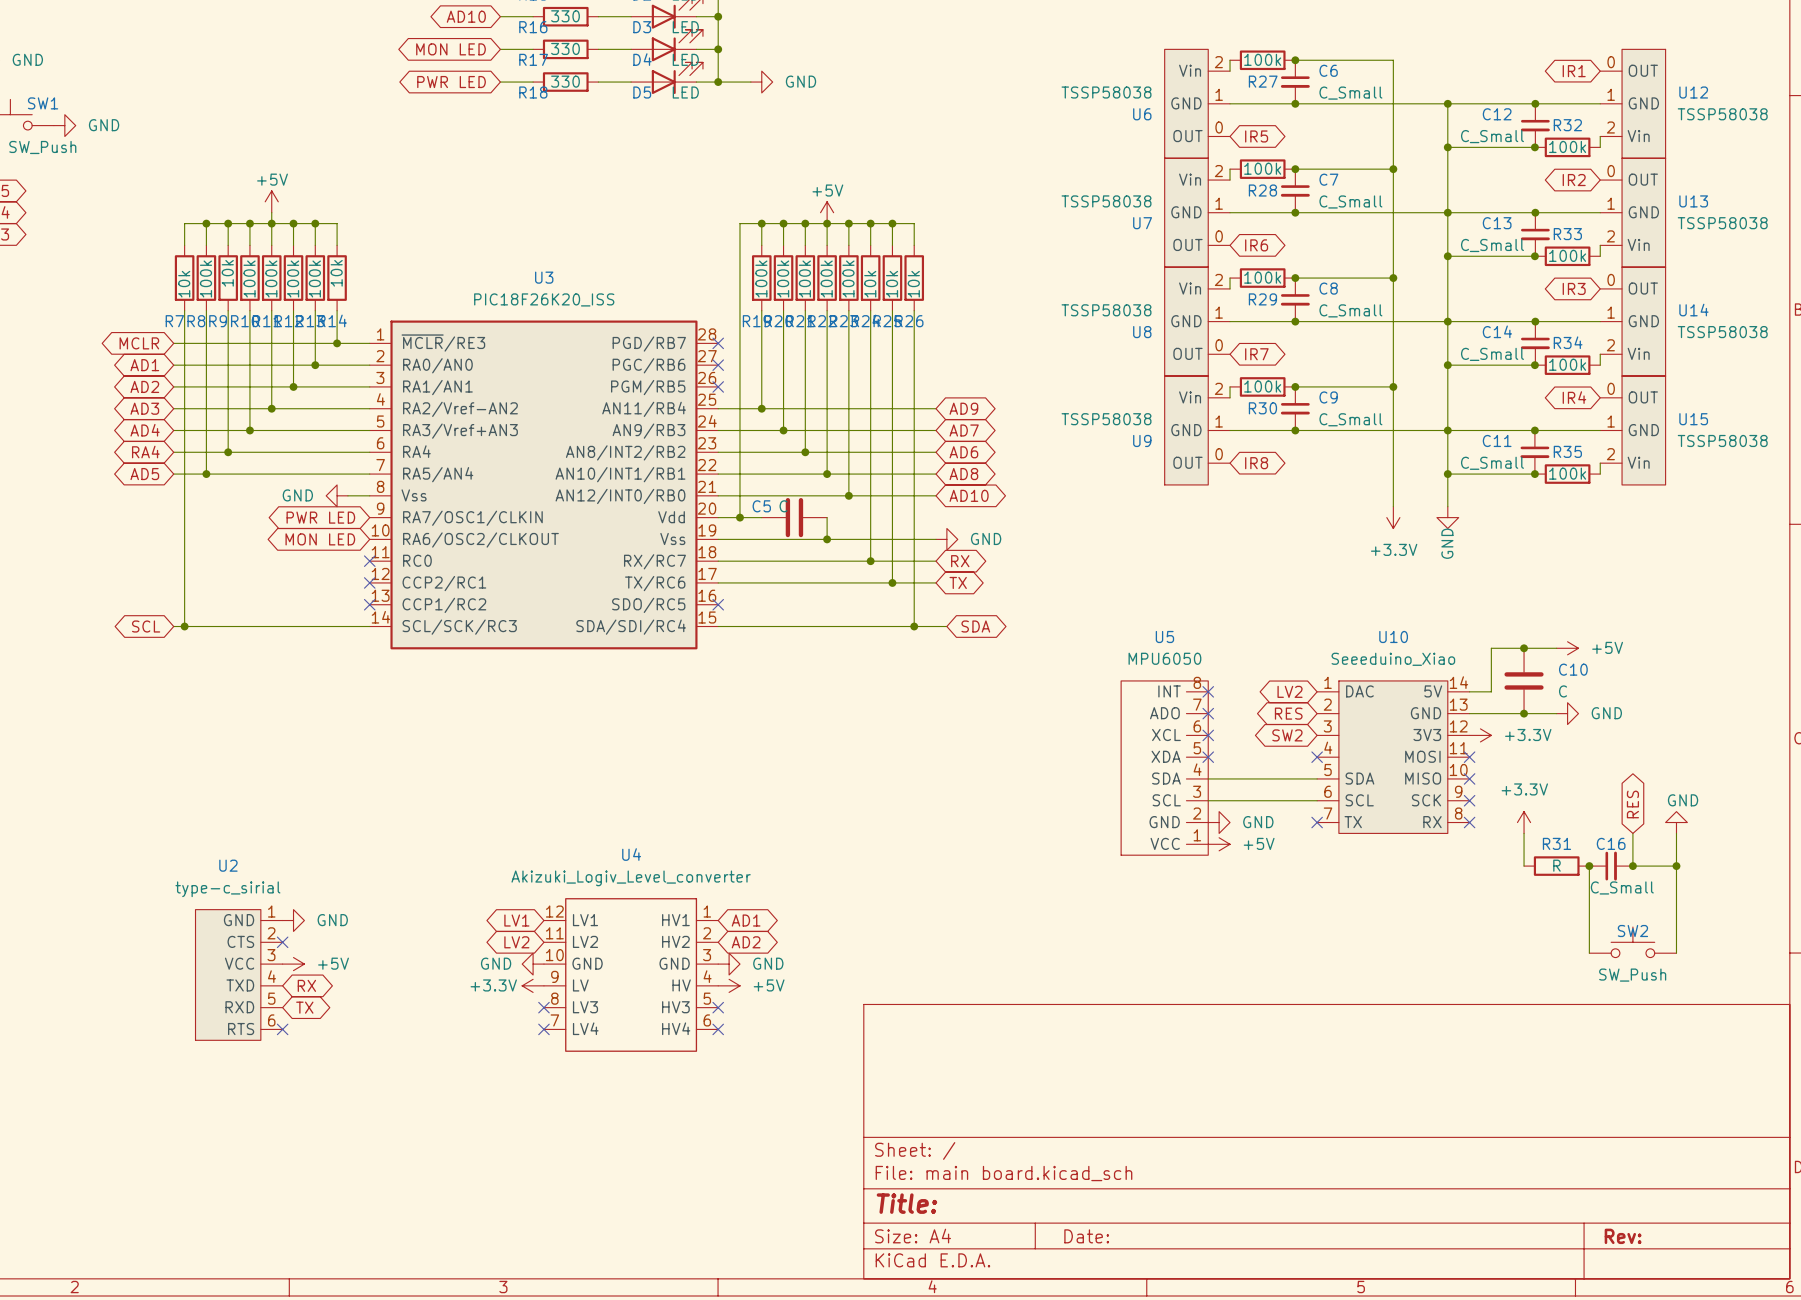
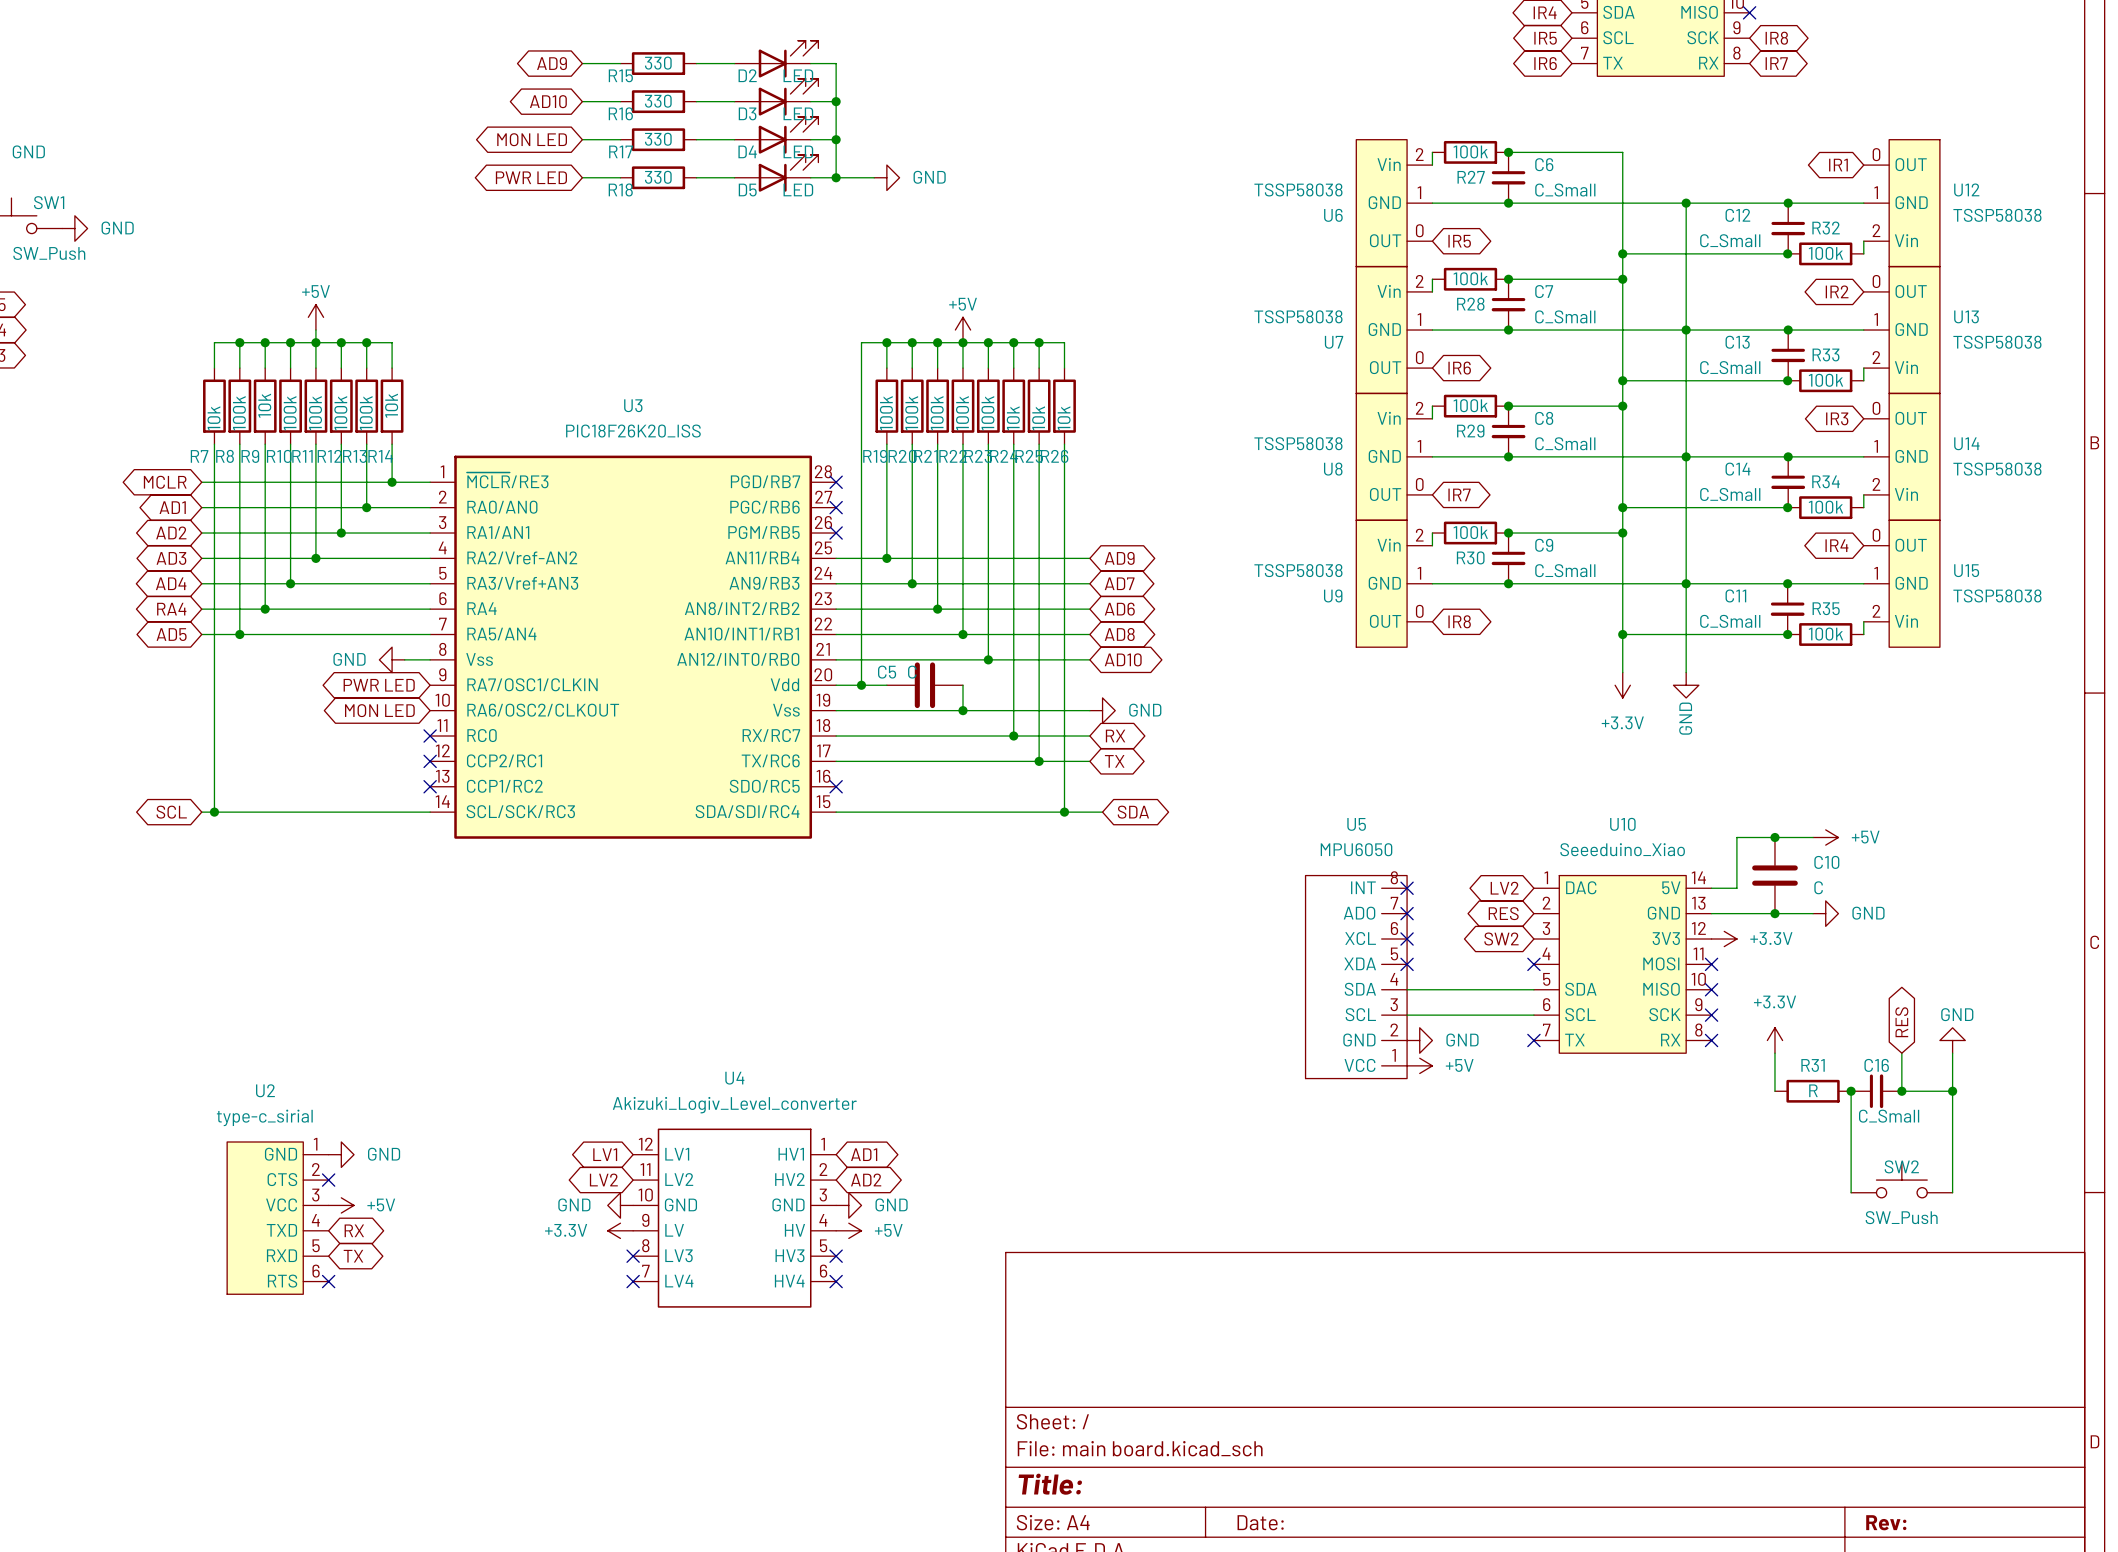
wire: none -> (1622, 253) (1686, 253)
junction: none -> (1622, 253)
junction: (1447, 147) -> none
wire: none -> (1622, 380) (1686, 380)
junction: none -> (1622, 380)
junction: (1447, 256) -> none
wire: none -> (1622, 507) (1686, 507)
junction: none -> (1622, 507)
junction: (1447, 365) -> none
wire: none -> (1622, 634) (1686, 634)
junction: none -> (1622, 634)
junction: (1447, 474) -> none

